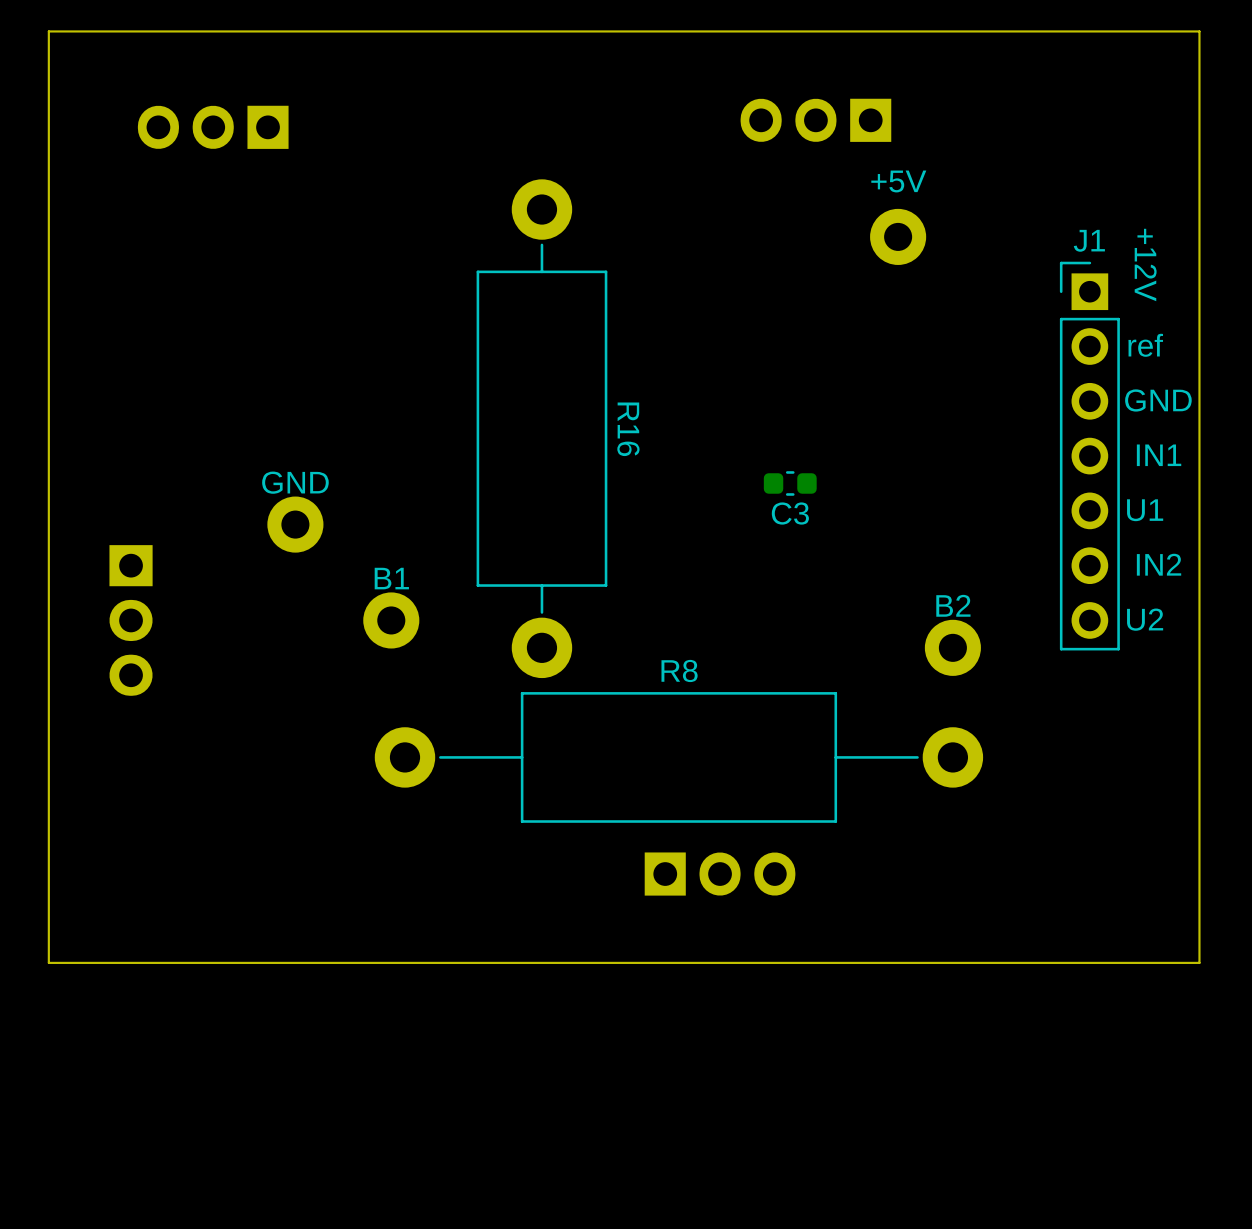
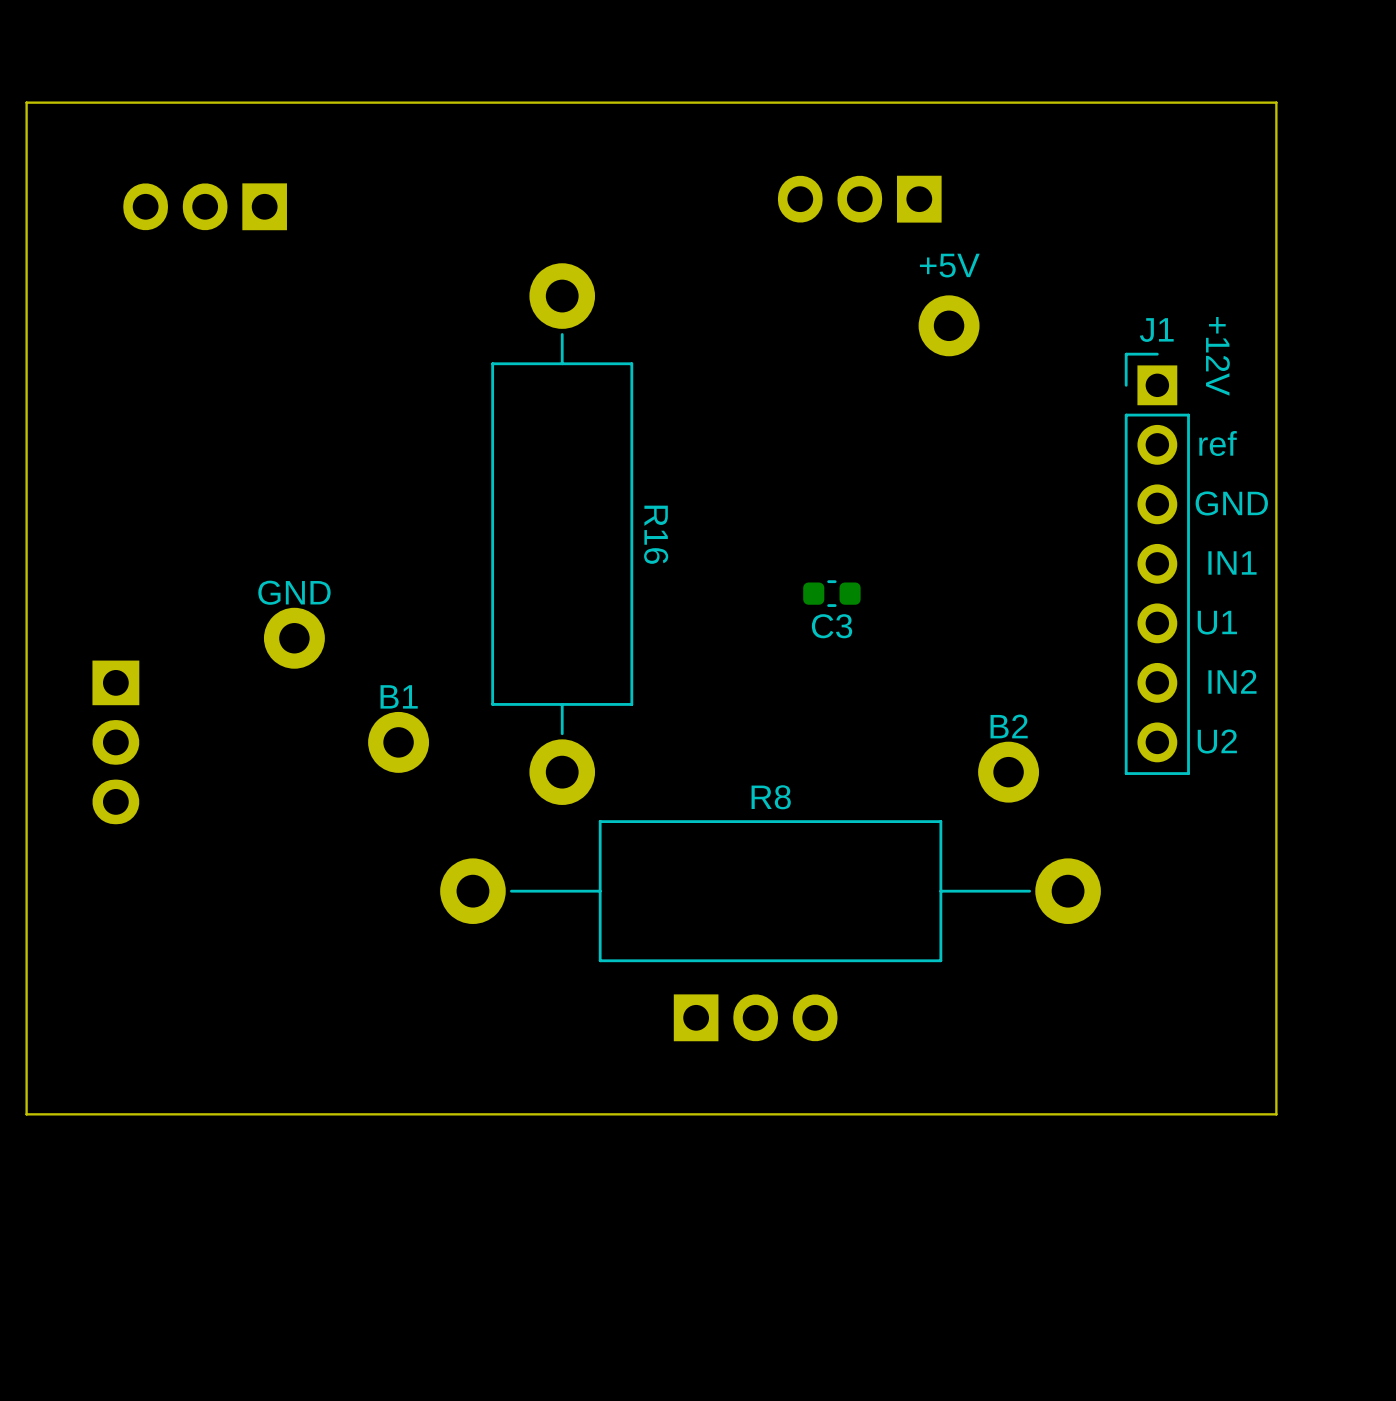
R8 position: (678, 757) -> (770, 891)

